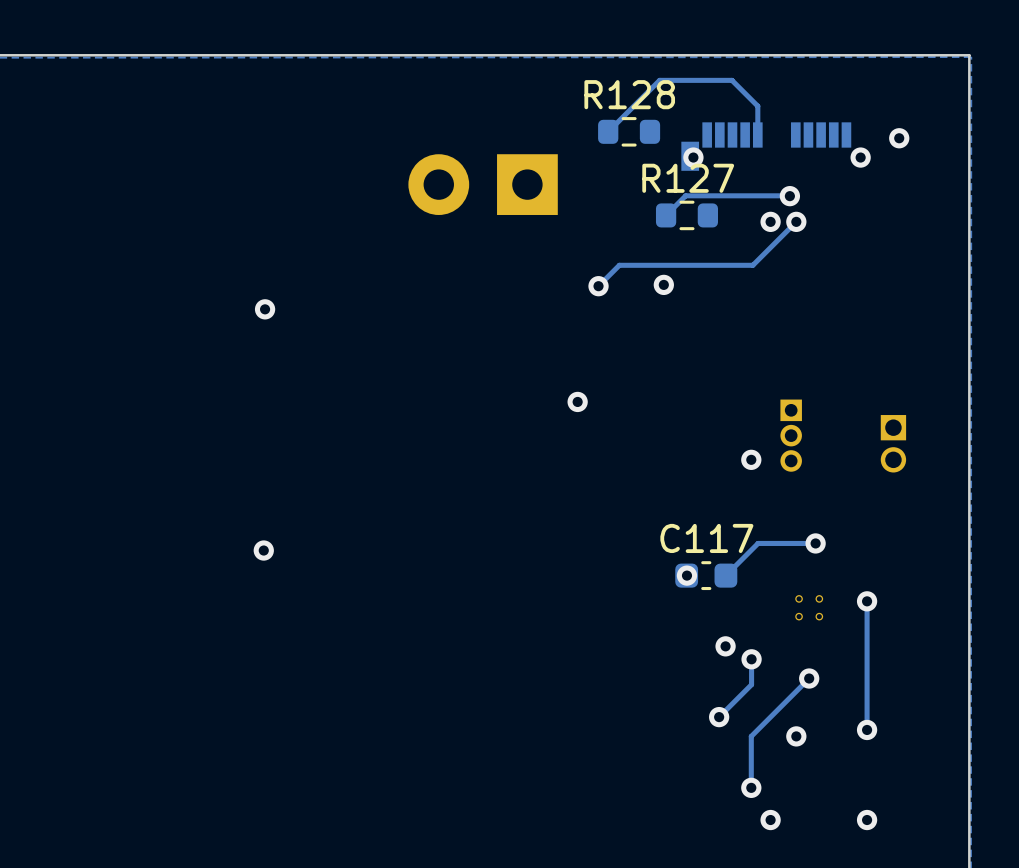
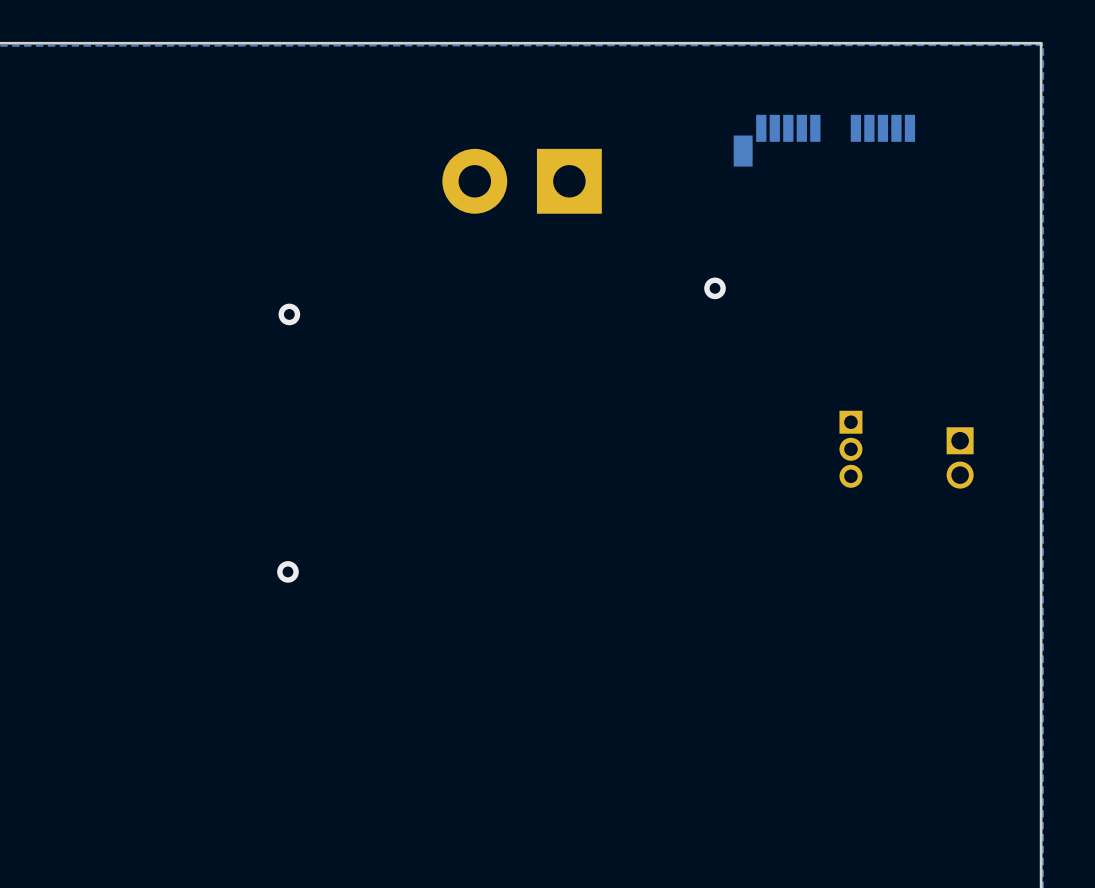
track: (608, 131) (659, 80) (732, 80) (757, 106) (757, 134) -> none
R128: (629, 131) -> none
via: (899, 138) -> none
via: (693, 157) -> none
via: (860, 157) -> none
track: (789, 195) (685, 195) (666, 215) -> none
via: (789, 196) -> none
R127: (686, 215) -> none
via: (770, 221) -> none
track: (796, 221) (752, 265) (619, 265) (598, 286) -> none
via: (796, 221) -> none
via: (598, 286) -> none
via: (577, 401) -> none
via: (751, 459) -> none
track: (815, 543) (758, 543) (725, 575) -> none
via: (815, 543) -> none
via: (686, 575) -> none
C117: (706, 575) -> none
track: (867, 601) (867, 729) -> none
via: (867, 601) -> none
part: (809, 607) -> none
via: (725, 646) -> none
track: (751, 659) (751, 684) (719, 717) -> none
via: (751, 659) -> none
track: (809, 678) (751, 736) (751, 787) -> none
via: (809, 678) -> none
via: (719, 717) -> none
via: (867, 729) -> none
via: (796, 736) -> none
via: (751, 787) -> none
via: (770, 820) -> none
via: (867, 820) -> none

